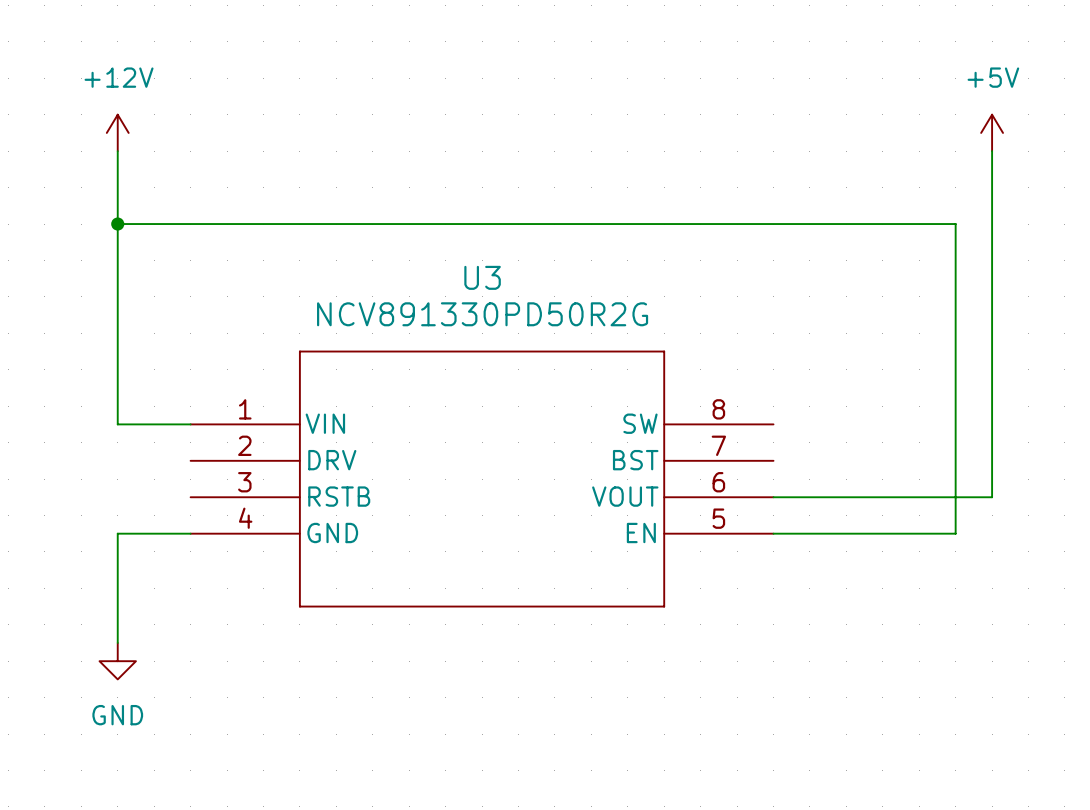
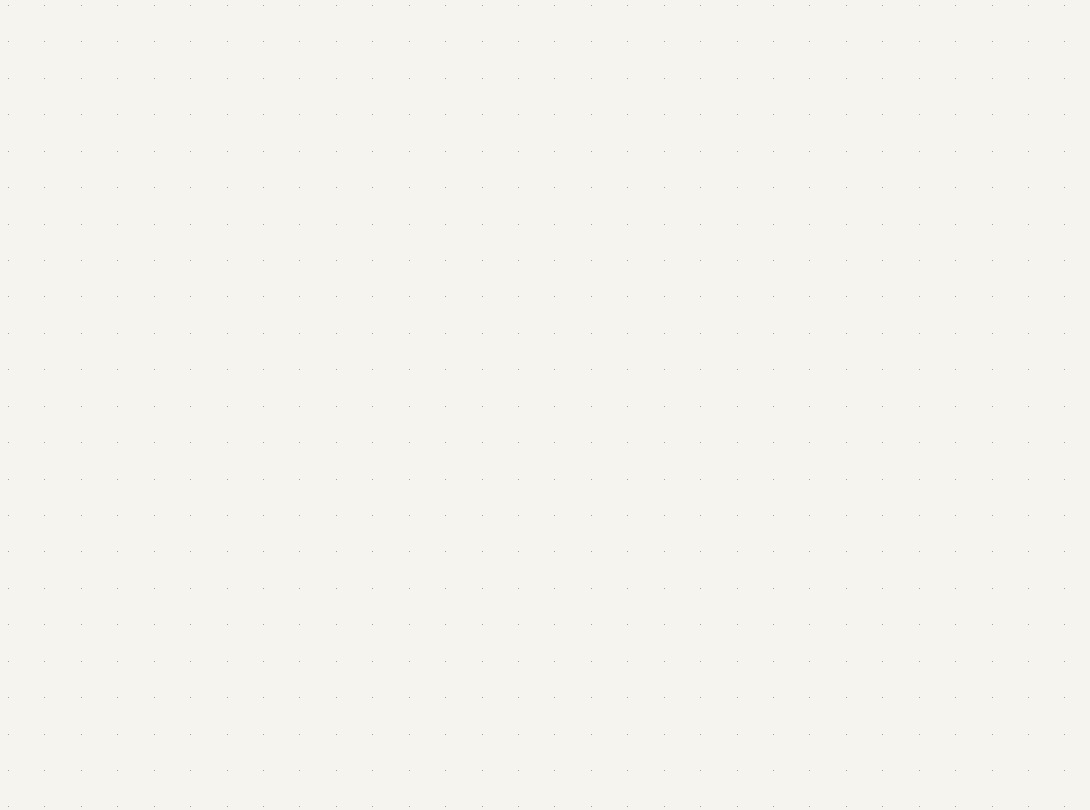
power symbol: +12V (117, 132) -> none
power symbol: +5V (992, 132) -> none
wire: (117, 151) (117, 424) (190, 424) -> none
wire: (992, 151) (992, 497) (773, 497) -> none
wire: (117, 224) (955, 224) (955, 533) (773, 533) -> none
junction: (117, 224) -> none
U3: NCV891330PD50R2G (482, 479) -> none
wire: (190, 533) (117, 533) (117, 642) -> none
power symbol: GND (117, 661) -> none

